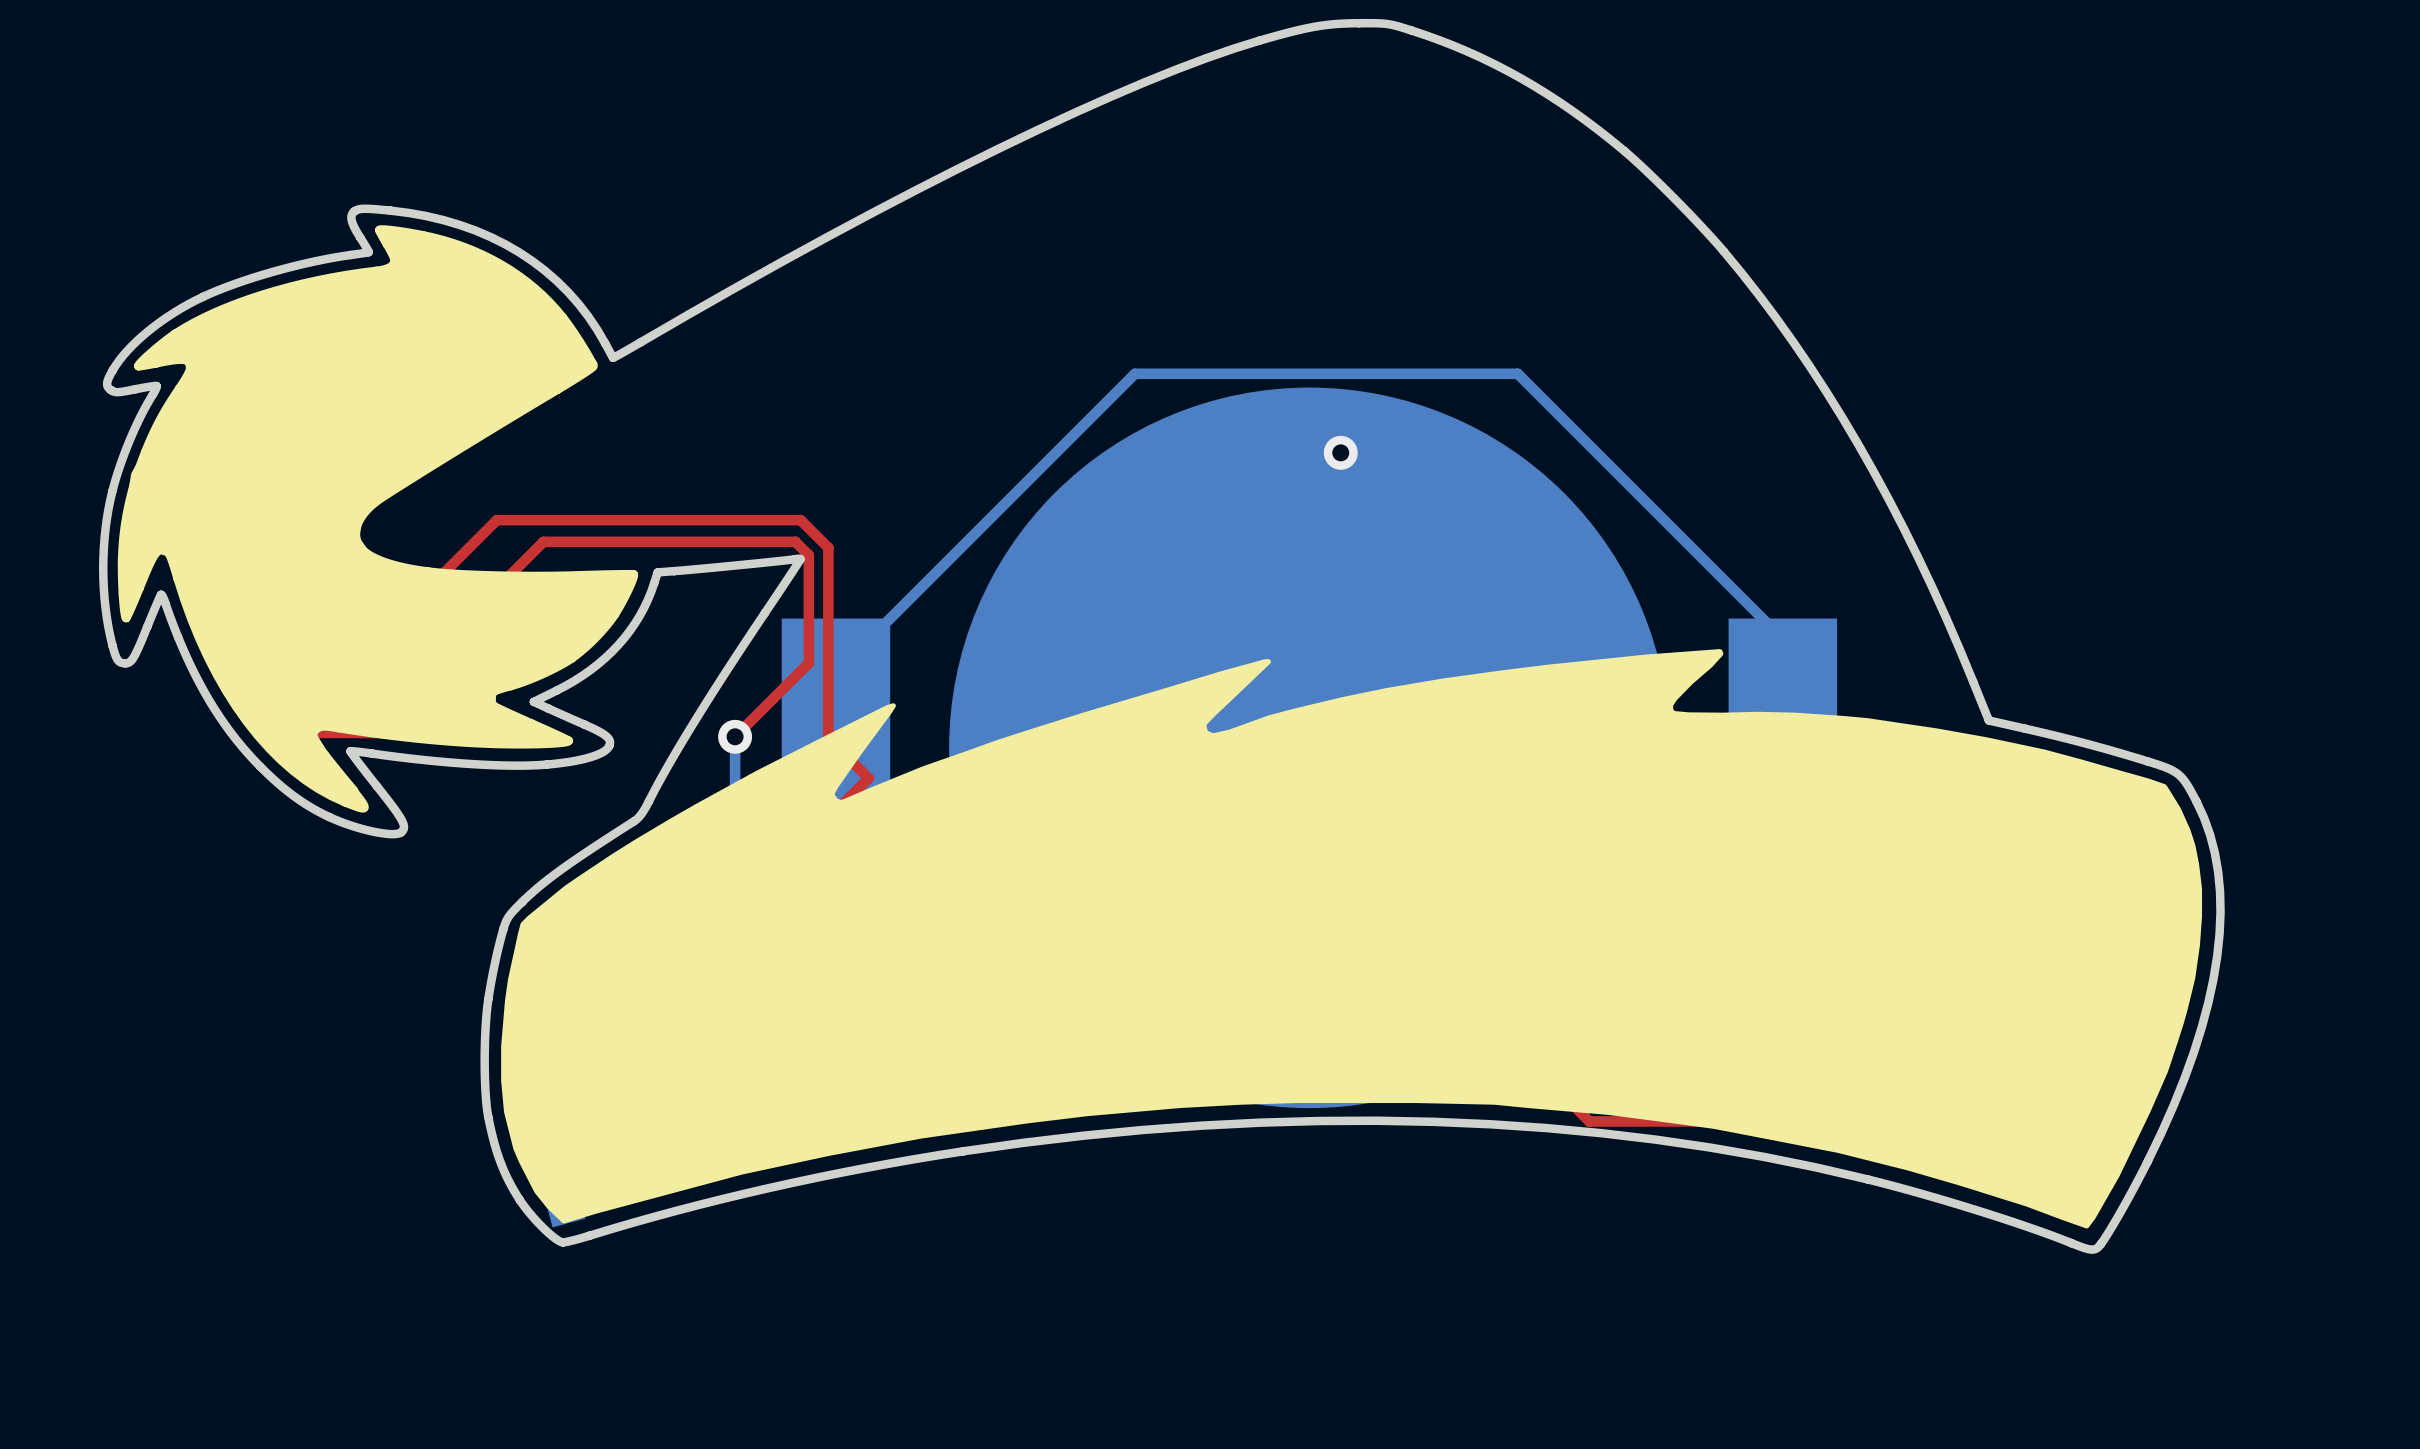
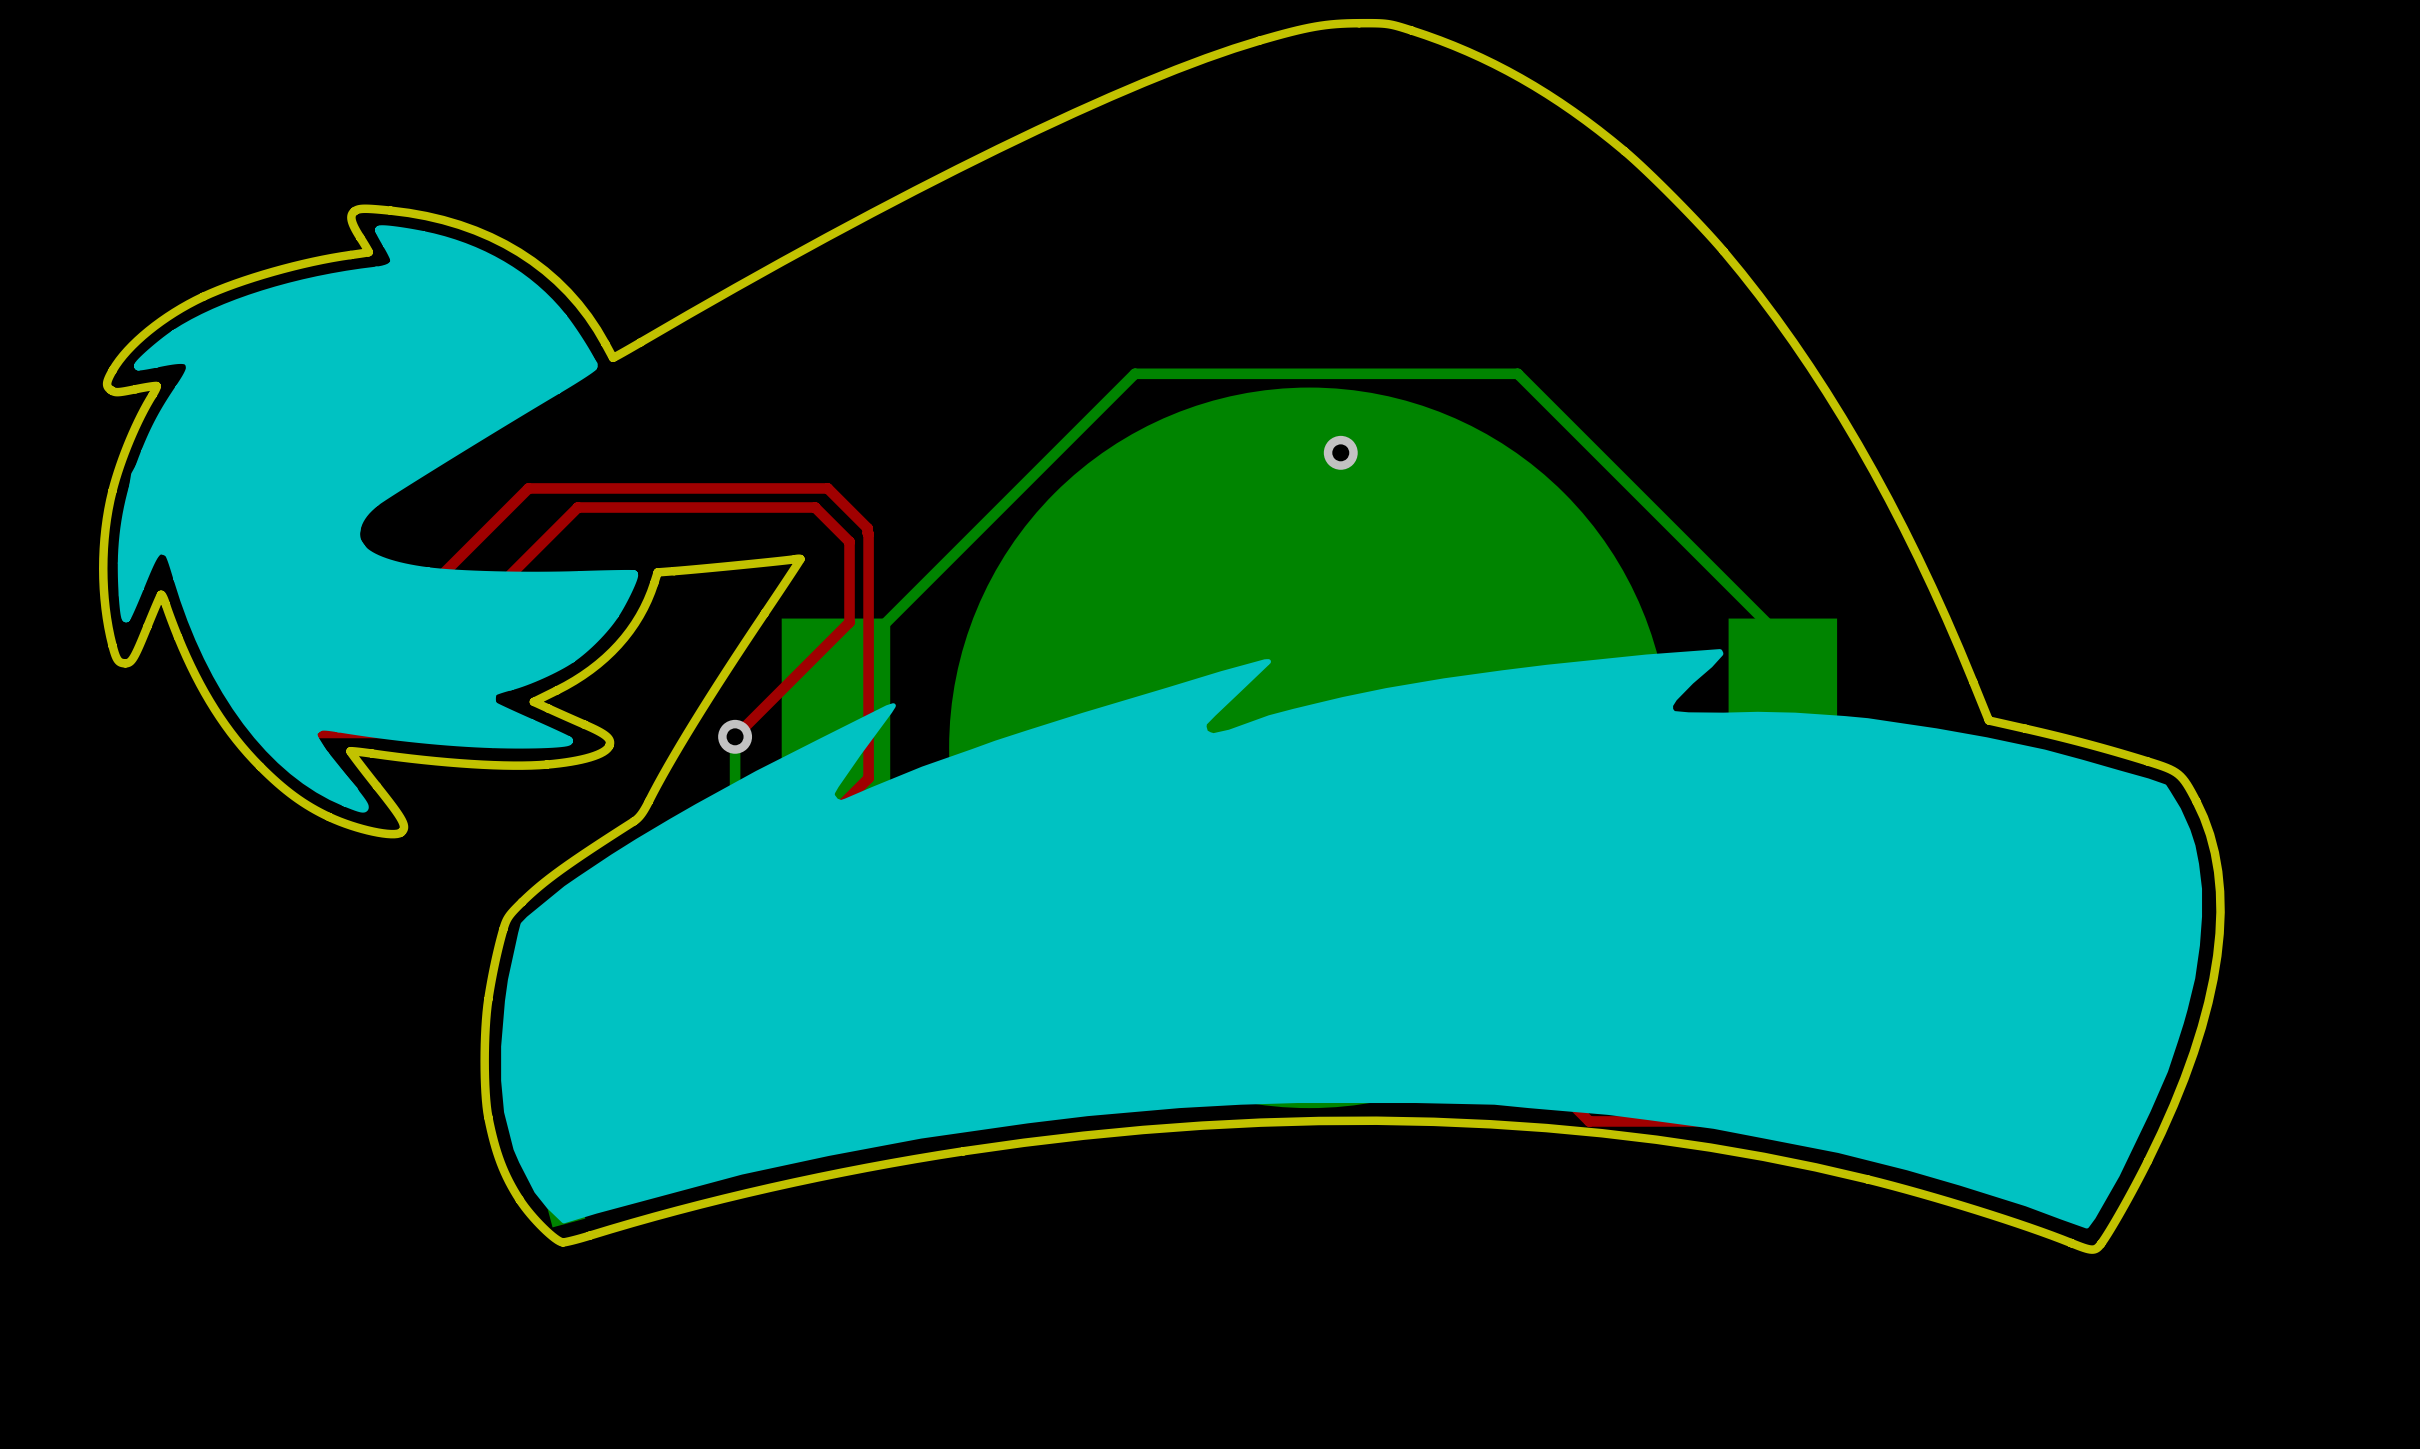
top track: (496, 520) (800, 520) (828, 547) (828, 738) (868, 778) -> (496, 520) (528, 488) (827, 488) (867, 528) (868, 533) (868, 778)
top track: (543, 541) (795, 541) (808, 555) (808, 663) -> (543, 541) (577, 507) (815, 507) (849, 541) (849, 622) (808, 663)

